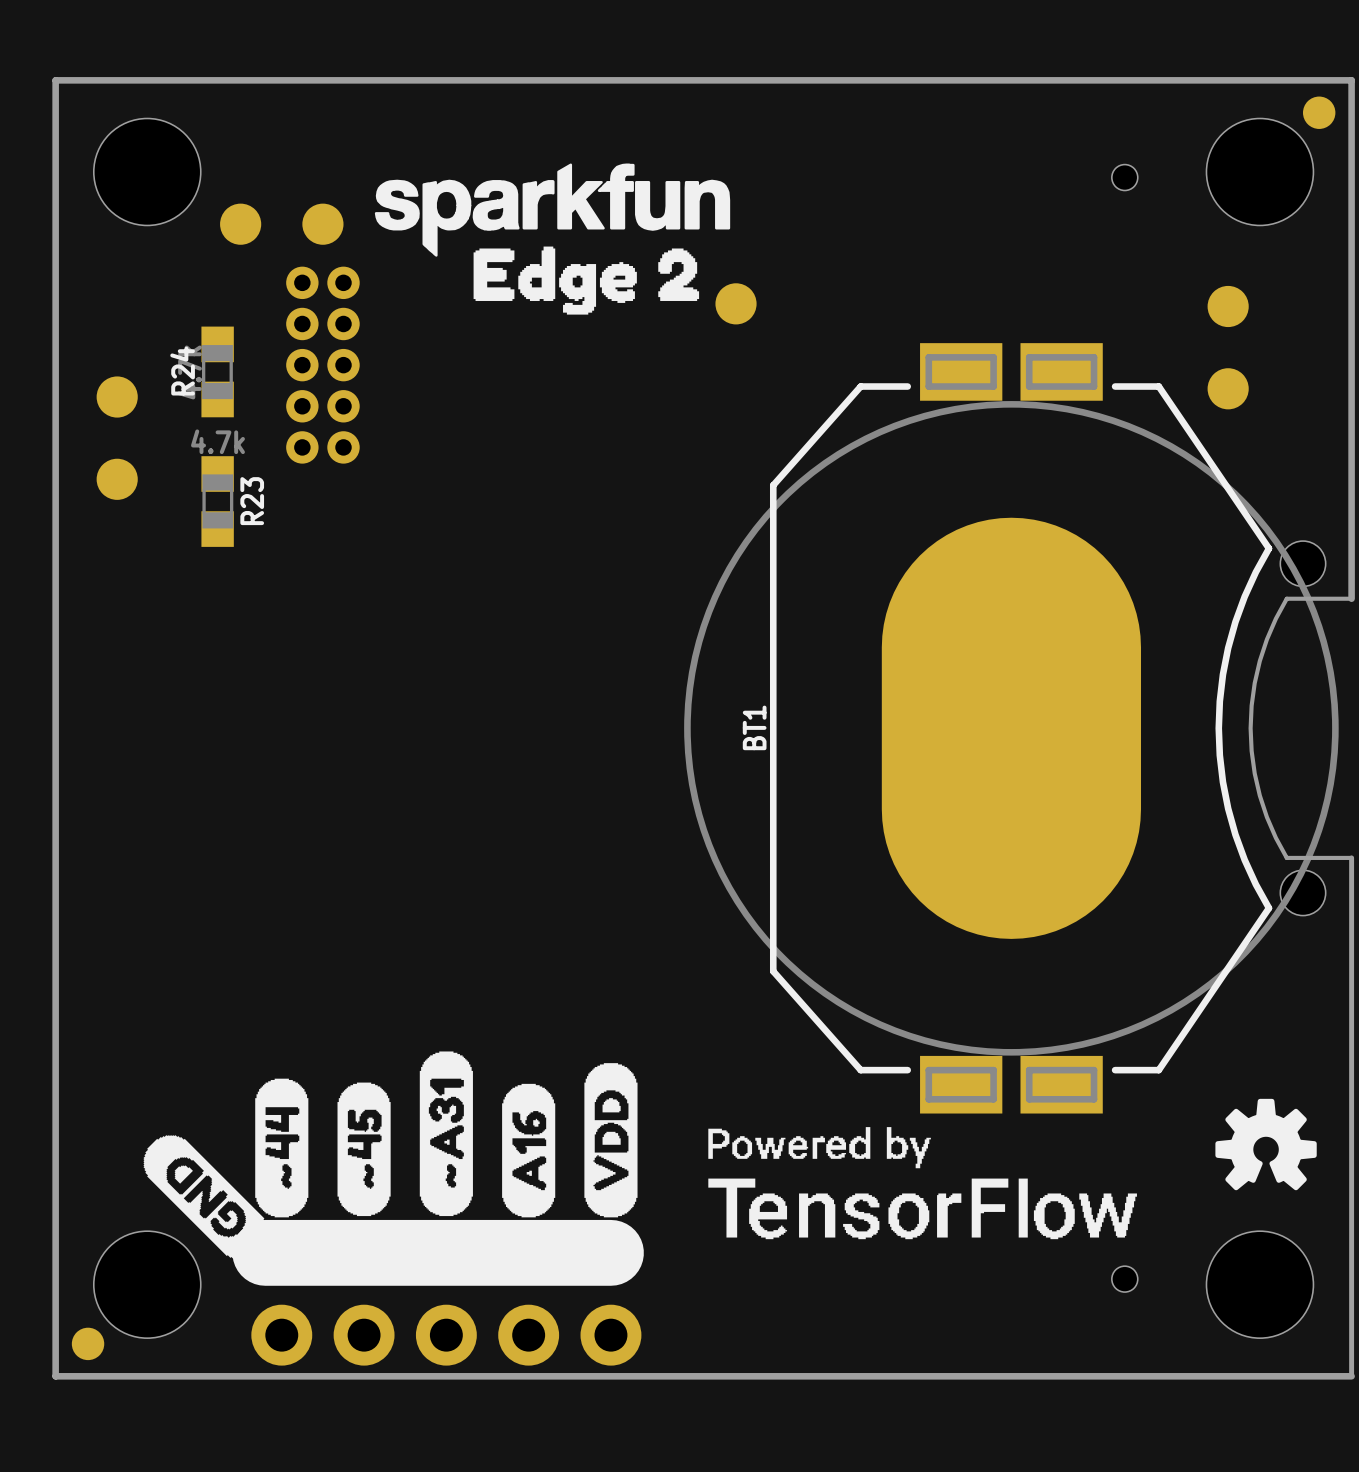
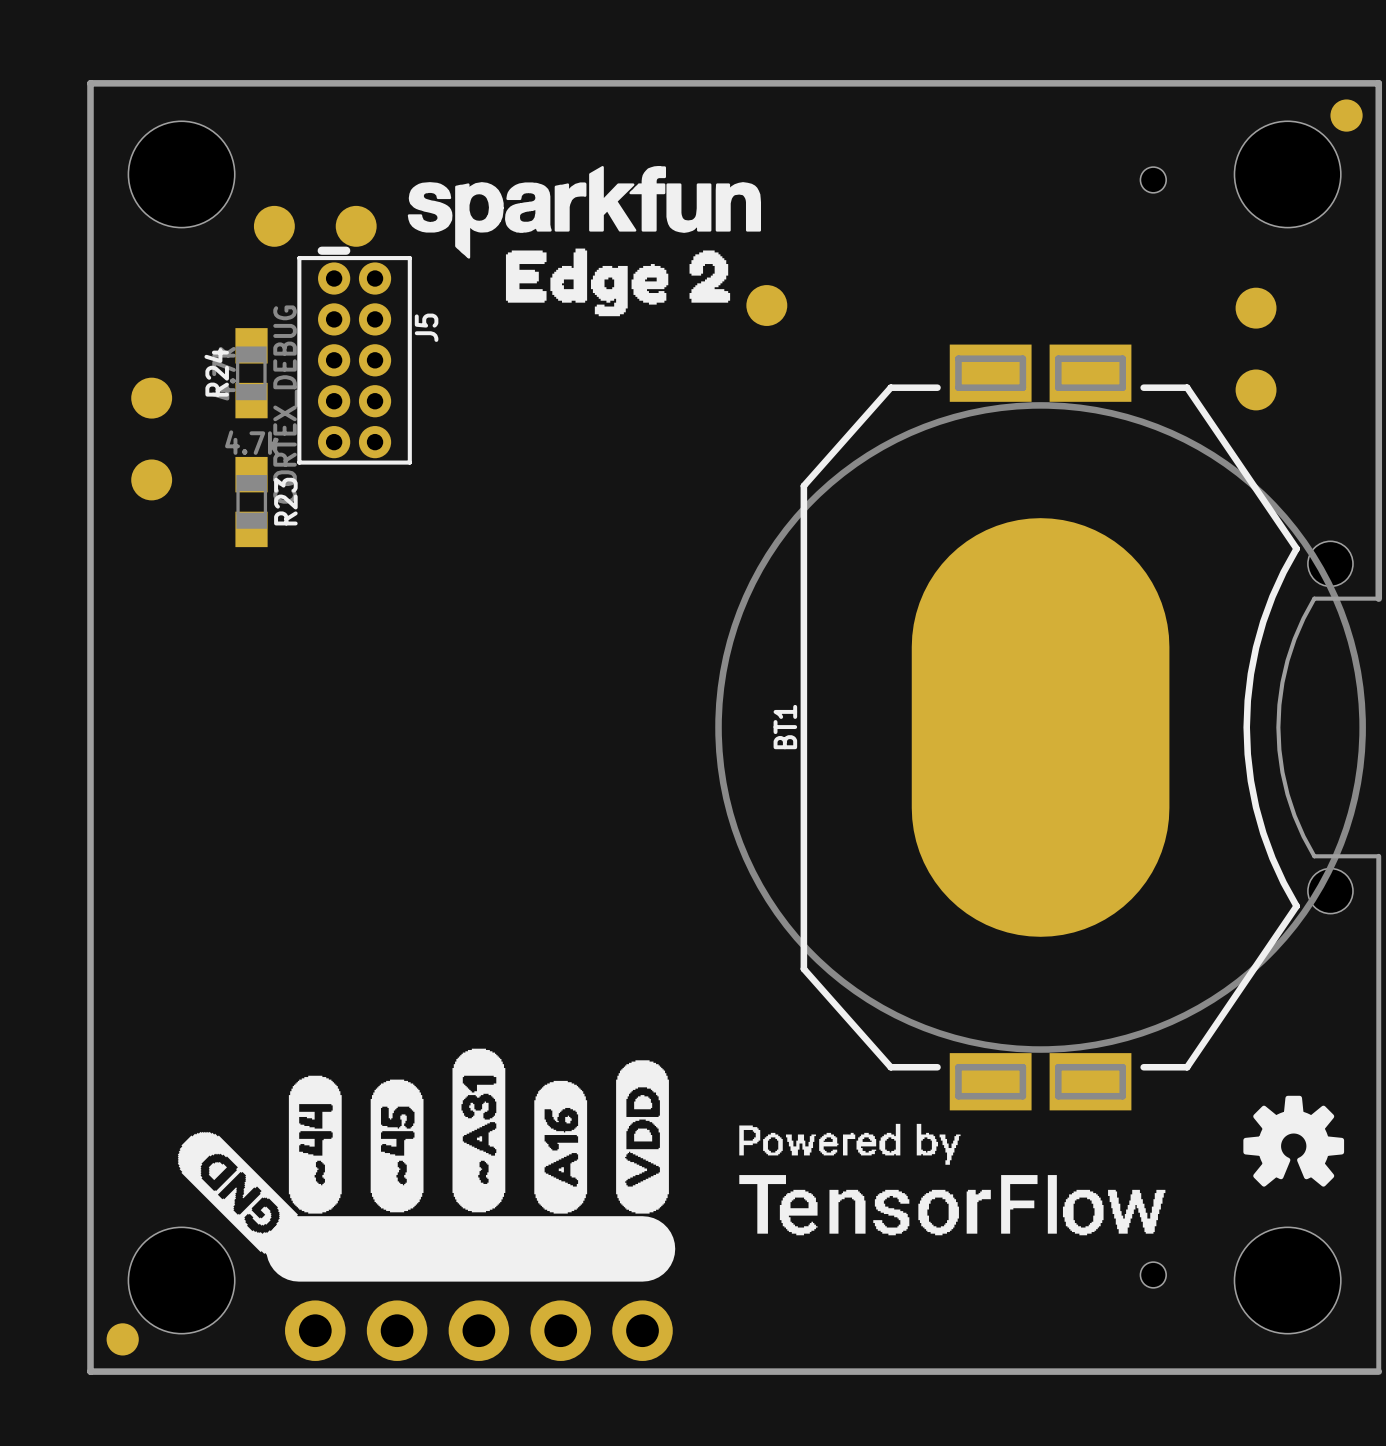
J5 side: top (322, 365) -> bottom (354, 355)

